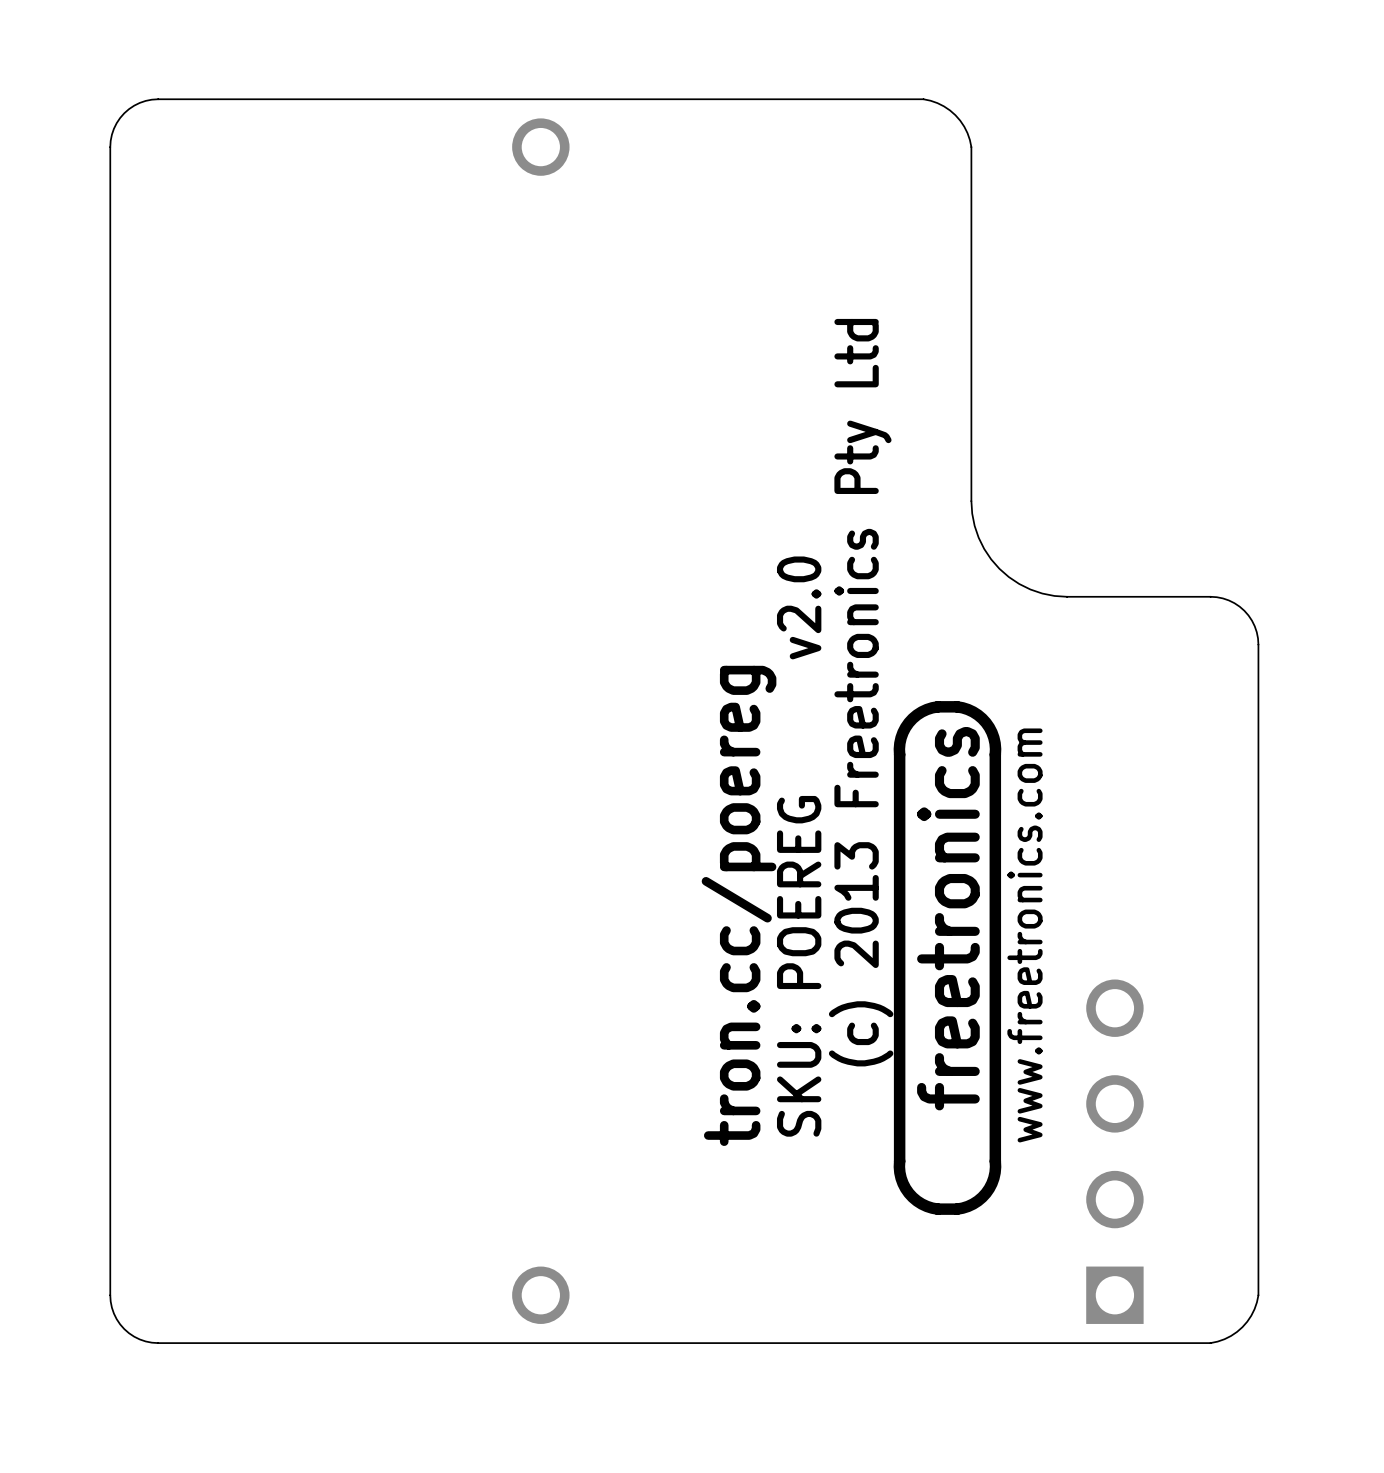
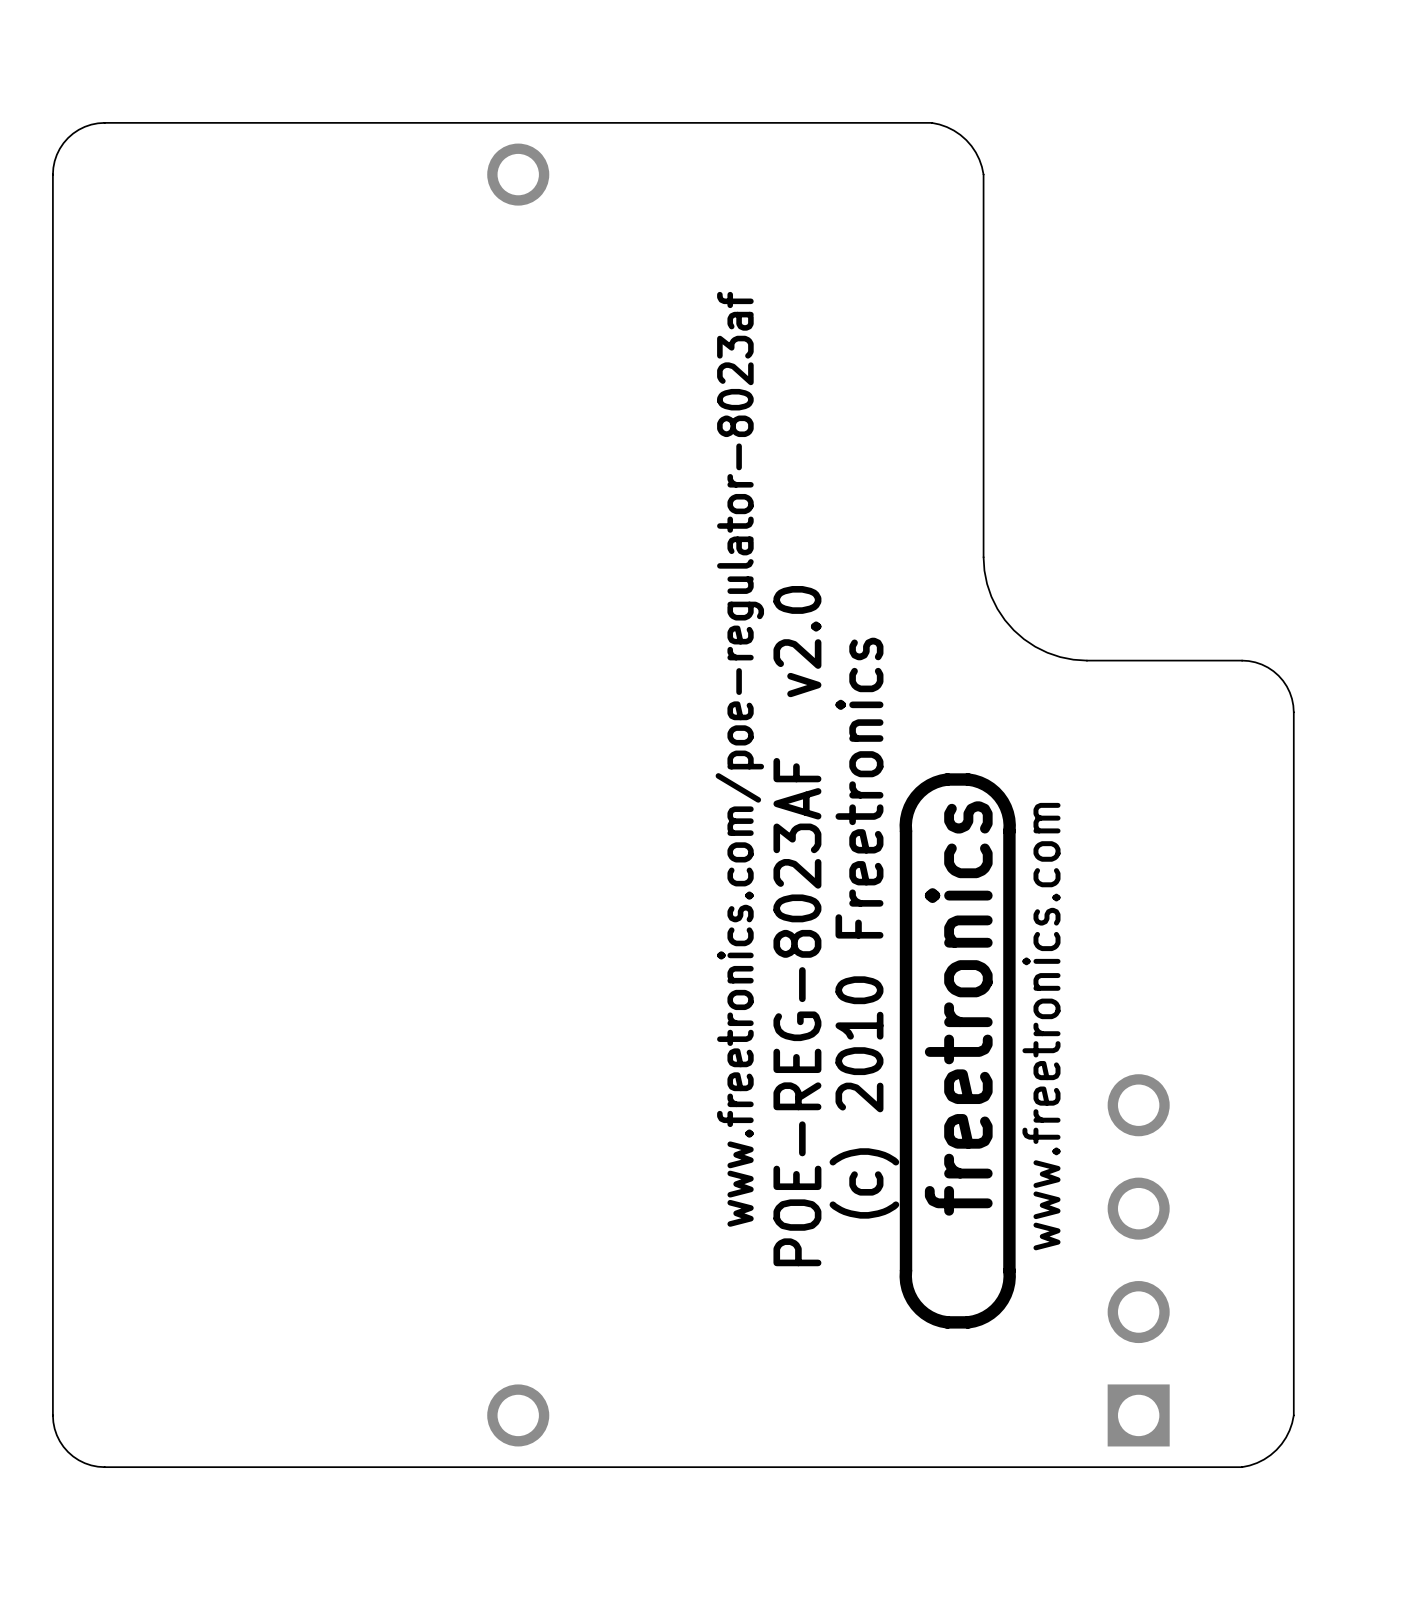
text: none -> www.freetronics.com/poe-regulator-8023af (739, 759)
text: (c) 2013 Freetronics Pty Ltd (861, 692) -> (c) 2010 Freetronics (864, 928)
text: SKU: POEREG v2.0 (799, 846) -> POE-REG-8023AF v2.0 (797, 926)
text: tron.cc/poereg (739, 905) -> none

